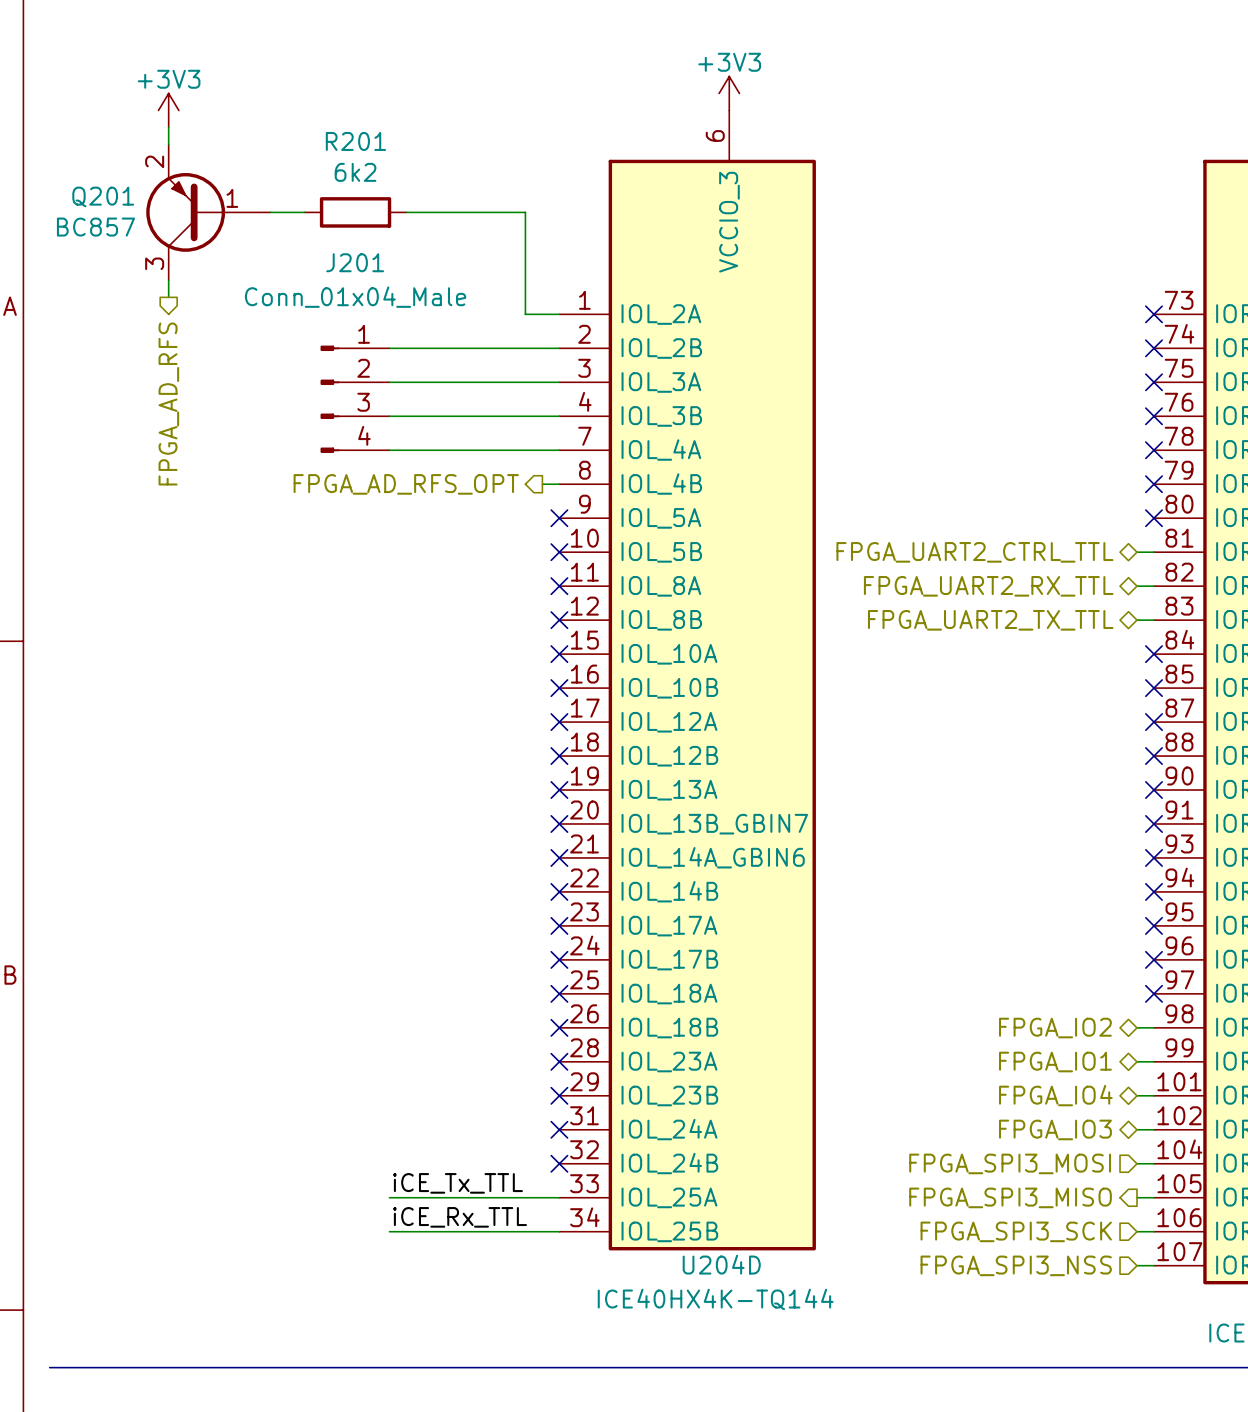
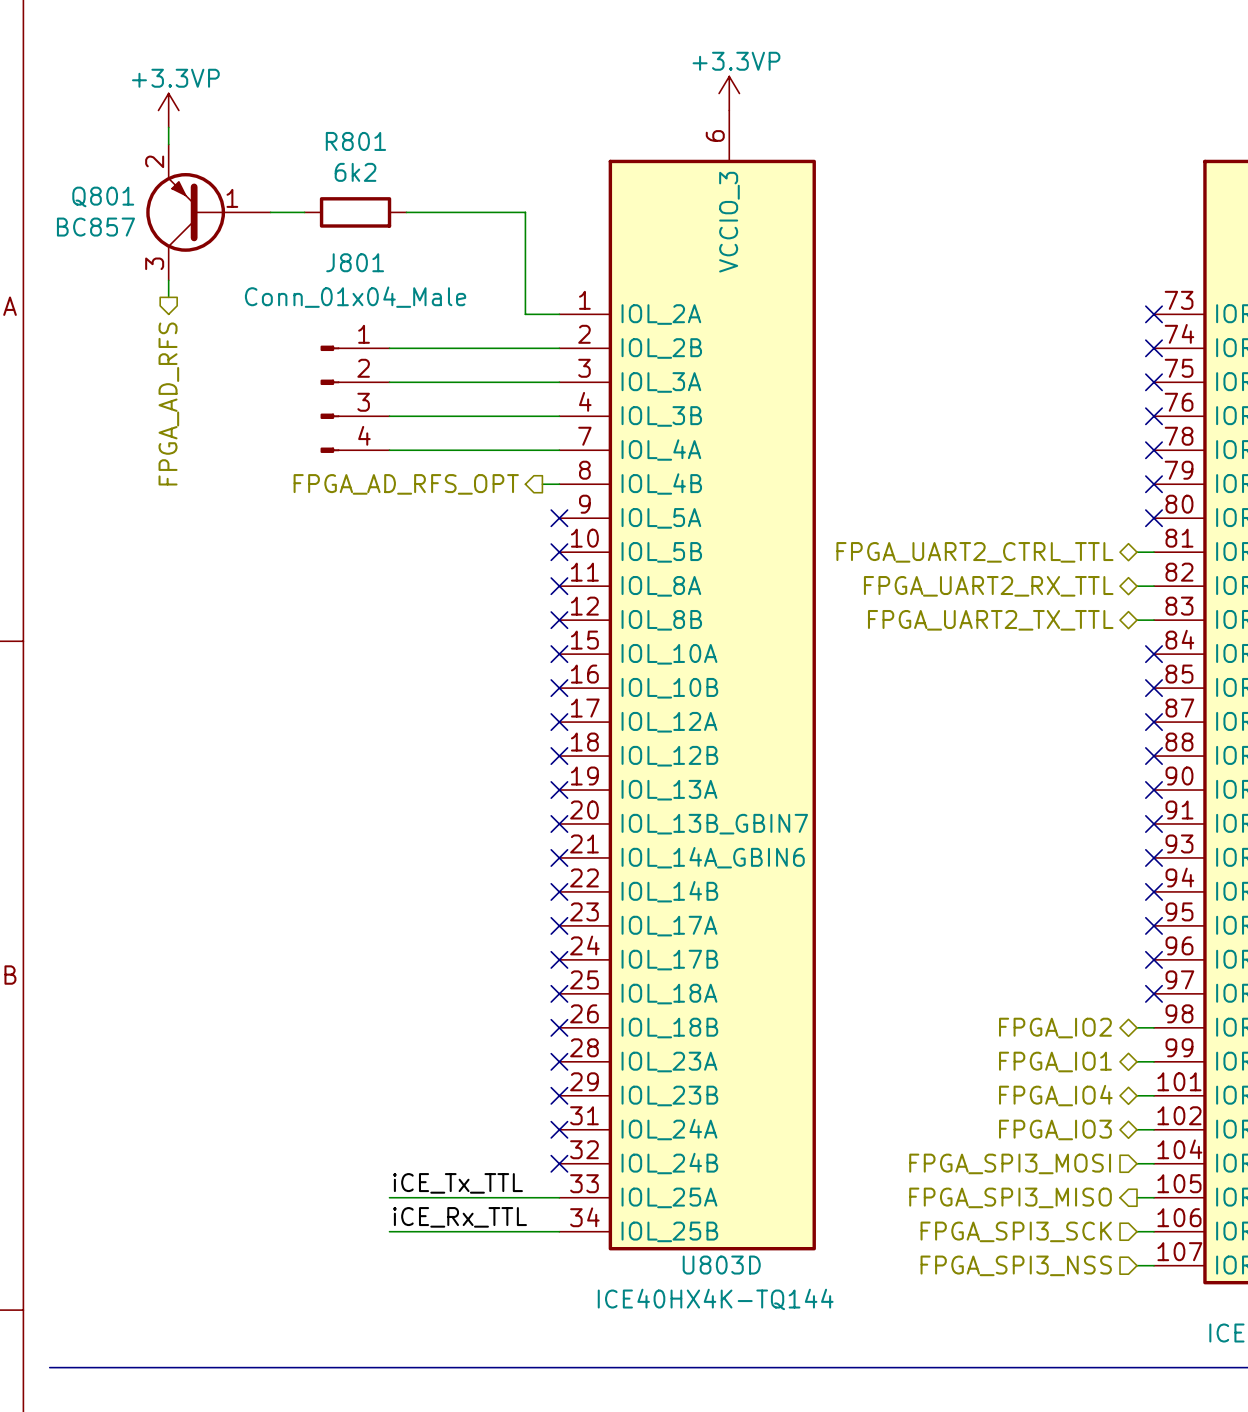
power symbol: +3V3 (729, 93) -> +3.3VP (729, 93)
power symbol: +3V3 (168, 110) -> +3.3VP (168, 110)
R201 name: R201 (355, 141) -> R801 (355, 141)
Q201 name: Q201 (103, 196) -> Q801 (103, 196)
J201 name: J201 (355, 262) -> J801 (355, 262)
U204D name: U204D (721, 1264) -> U803D (721, 1265)

